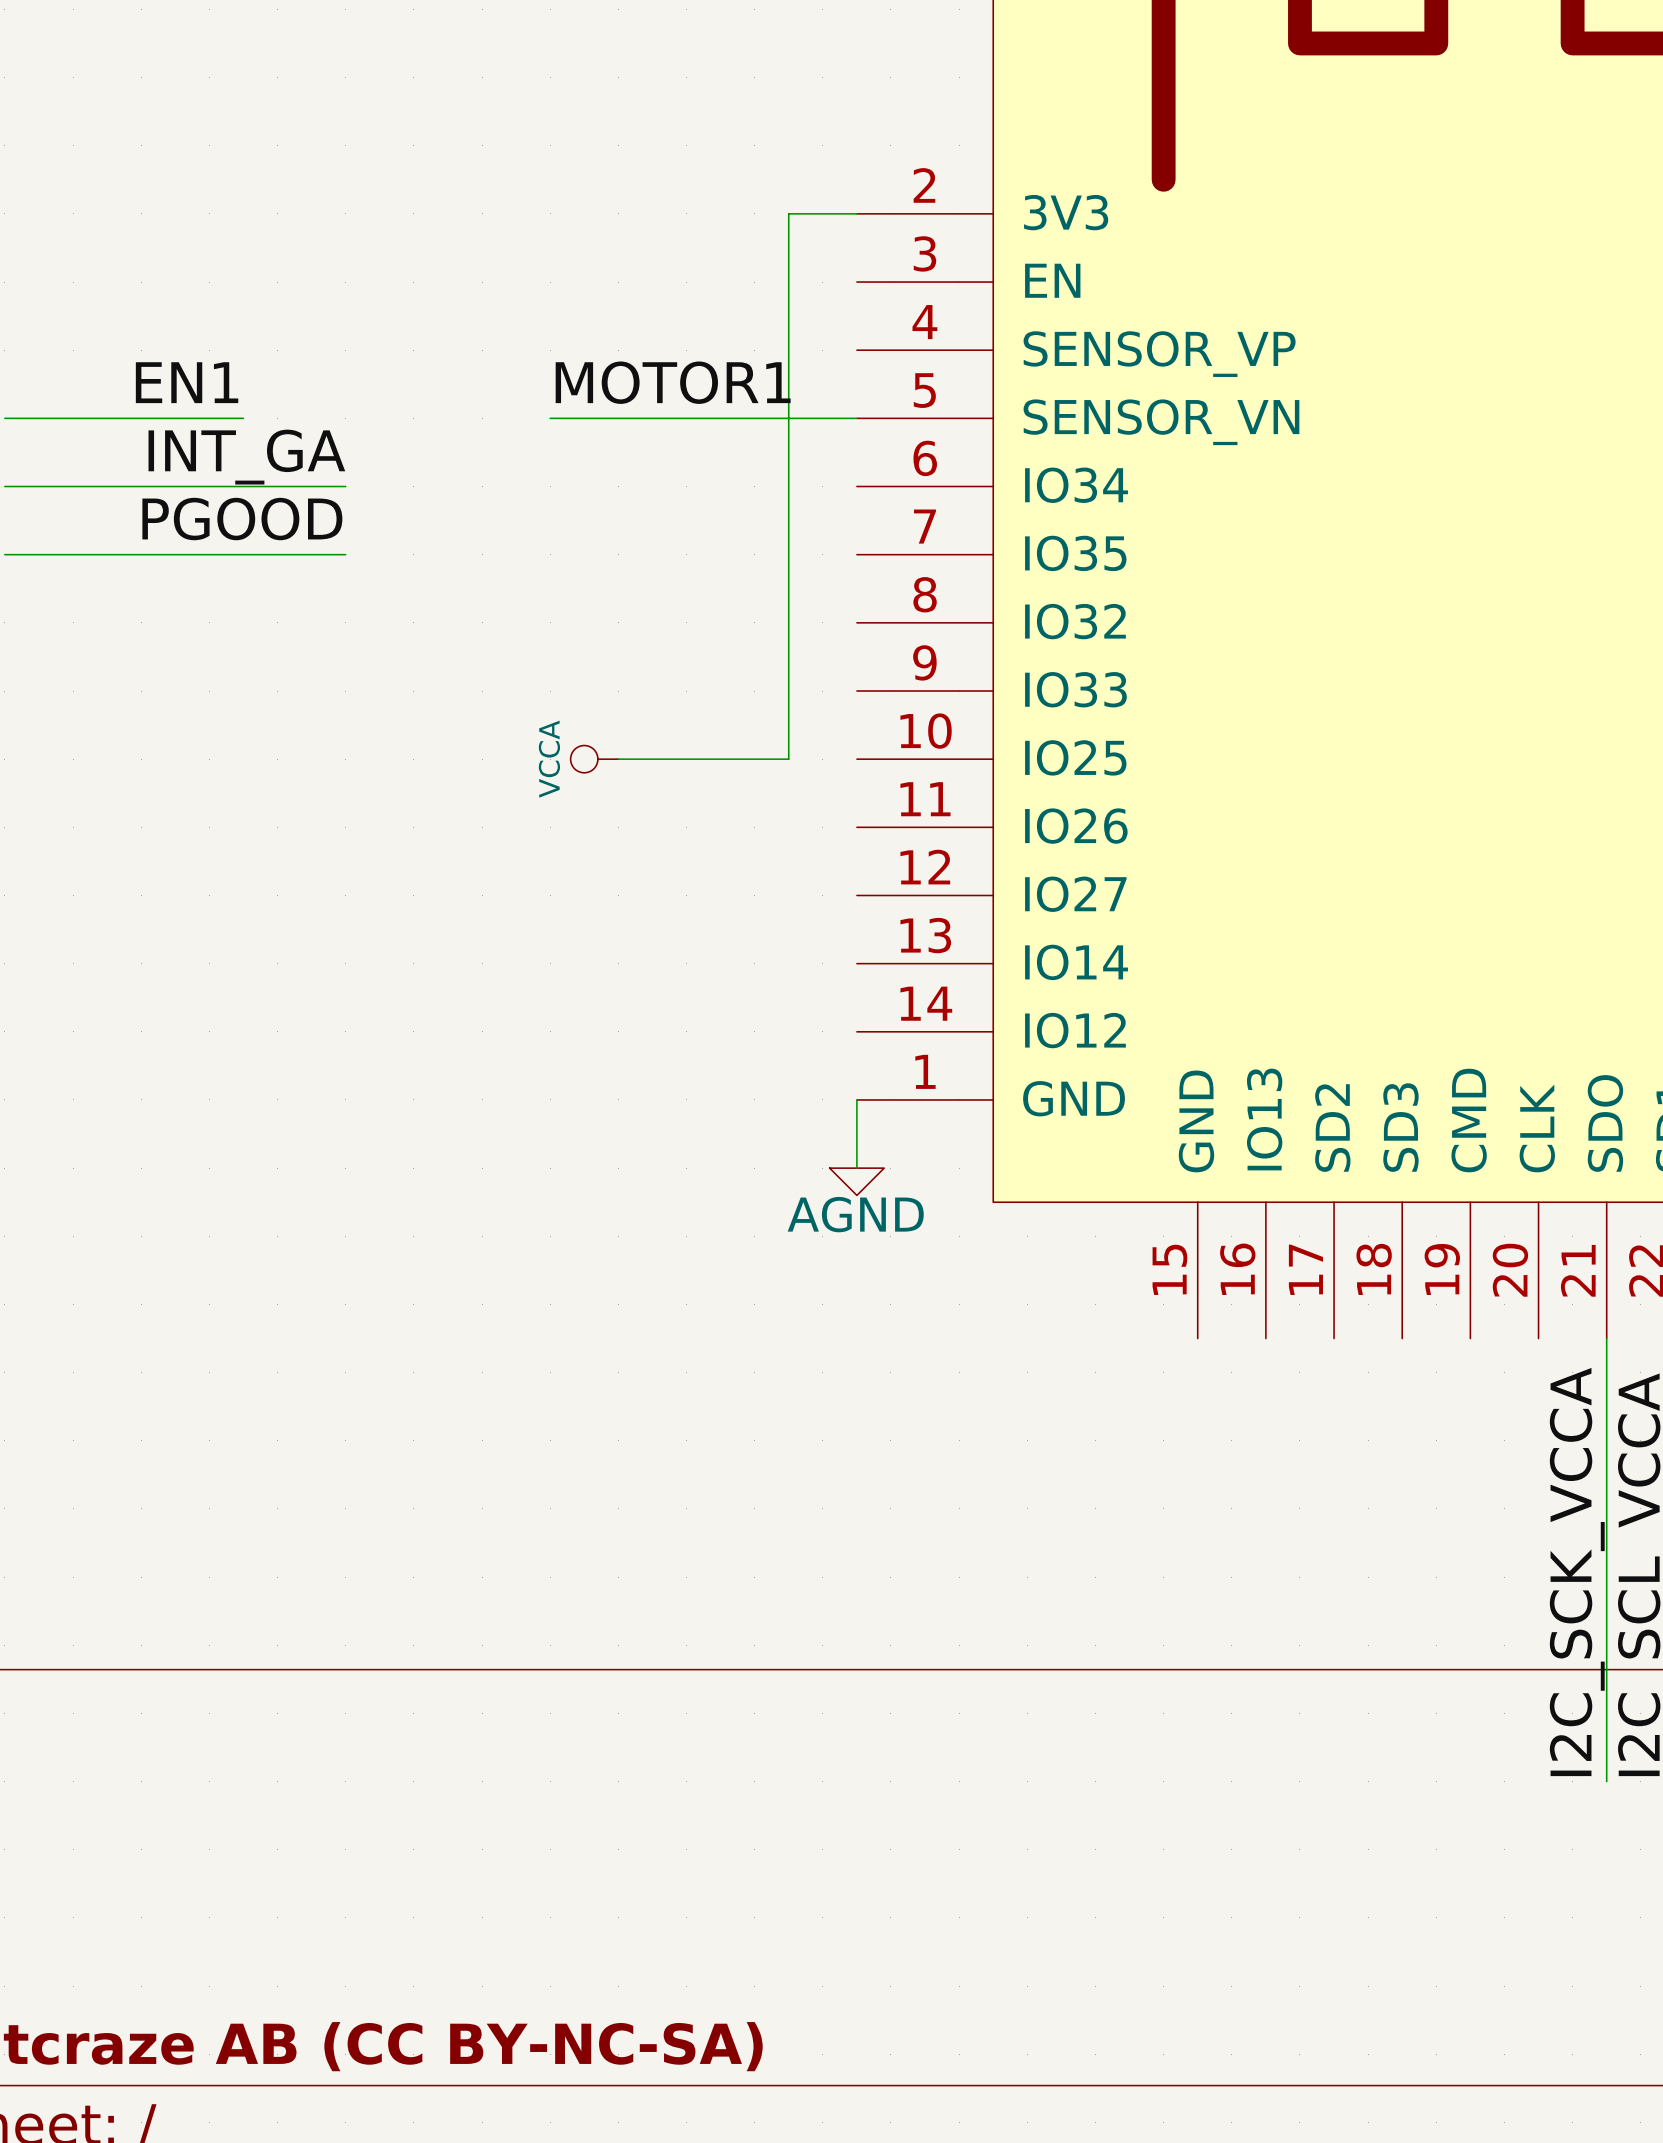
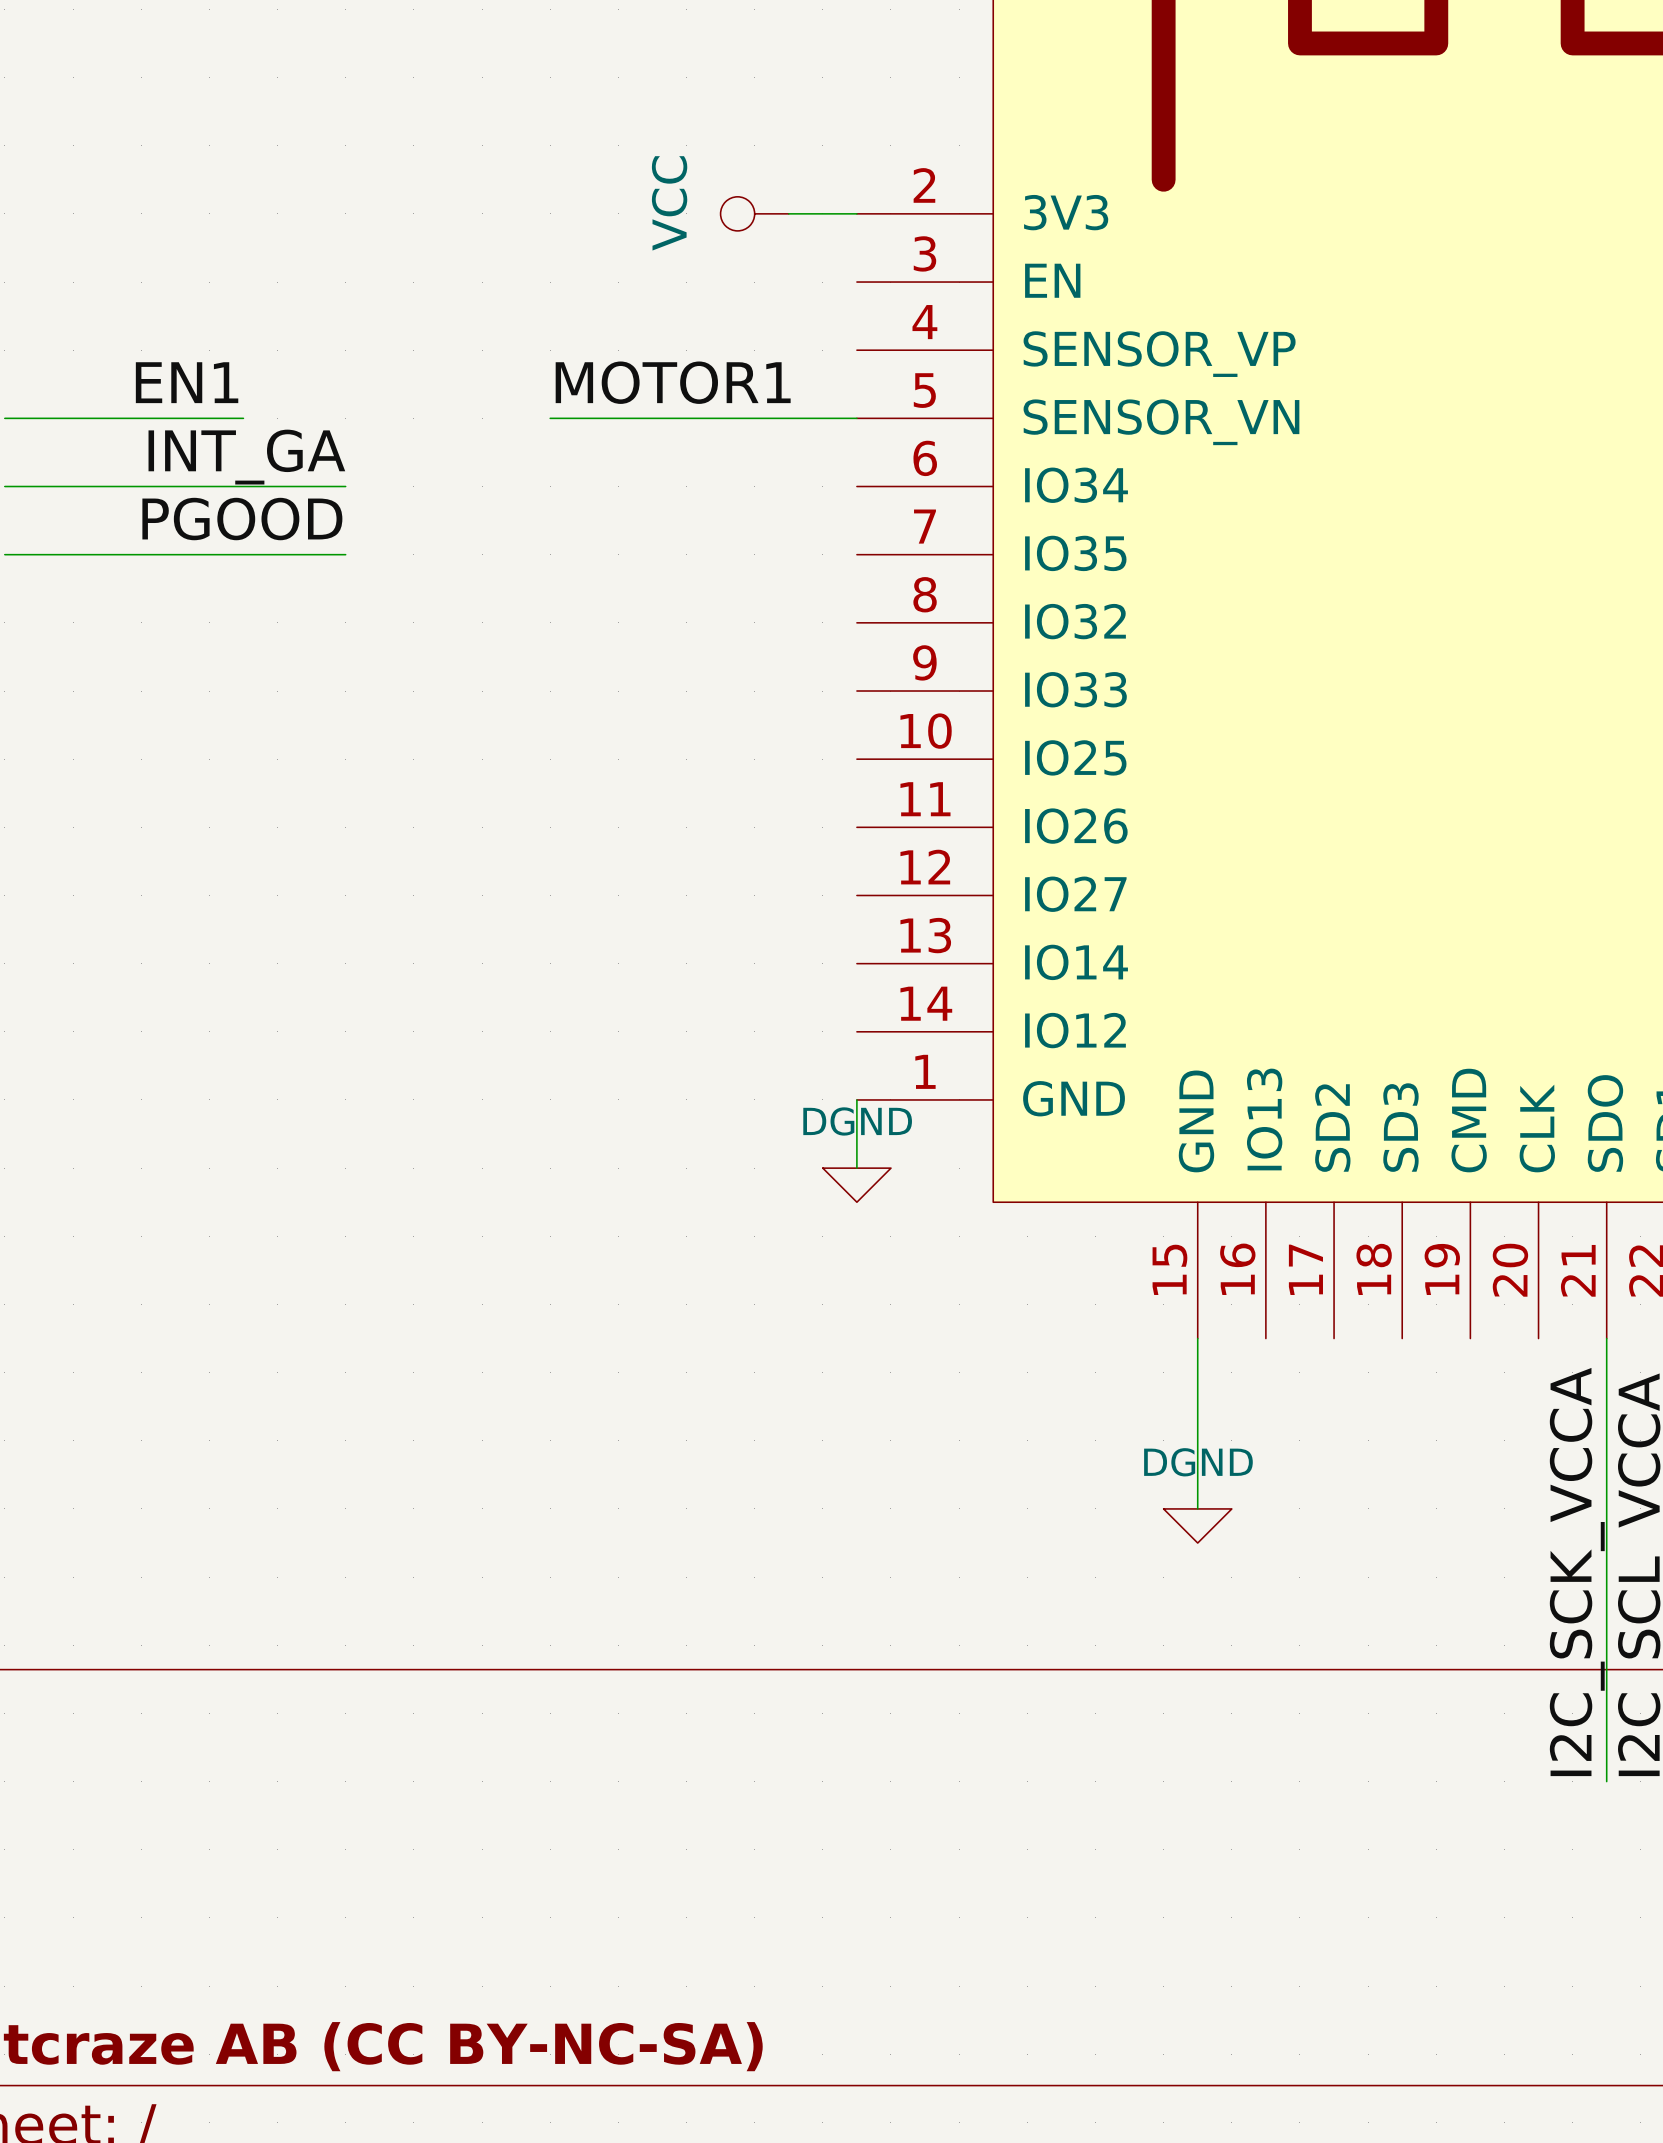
power symbol: none -> VCC (754, 213)
wire: (788, 213) (788, 759) (618, 759) -> none
power symbol: VCCA (594, 759) -> none
power symbol: AGND (856, 1181) -> DGND (856, 1185)
wire: none -> (1197, 1338) (1197, 1508)
power symbol: none -> DGND (1197, 1525)

